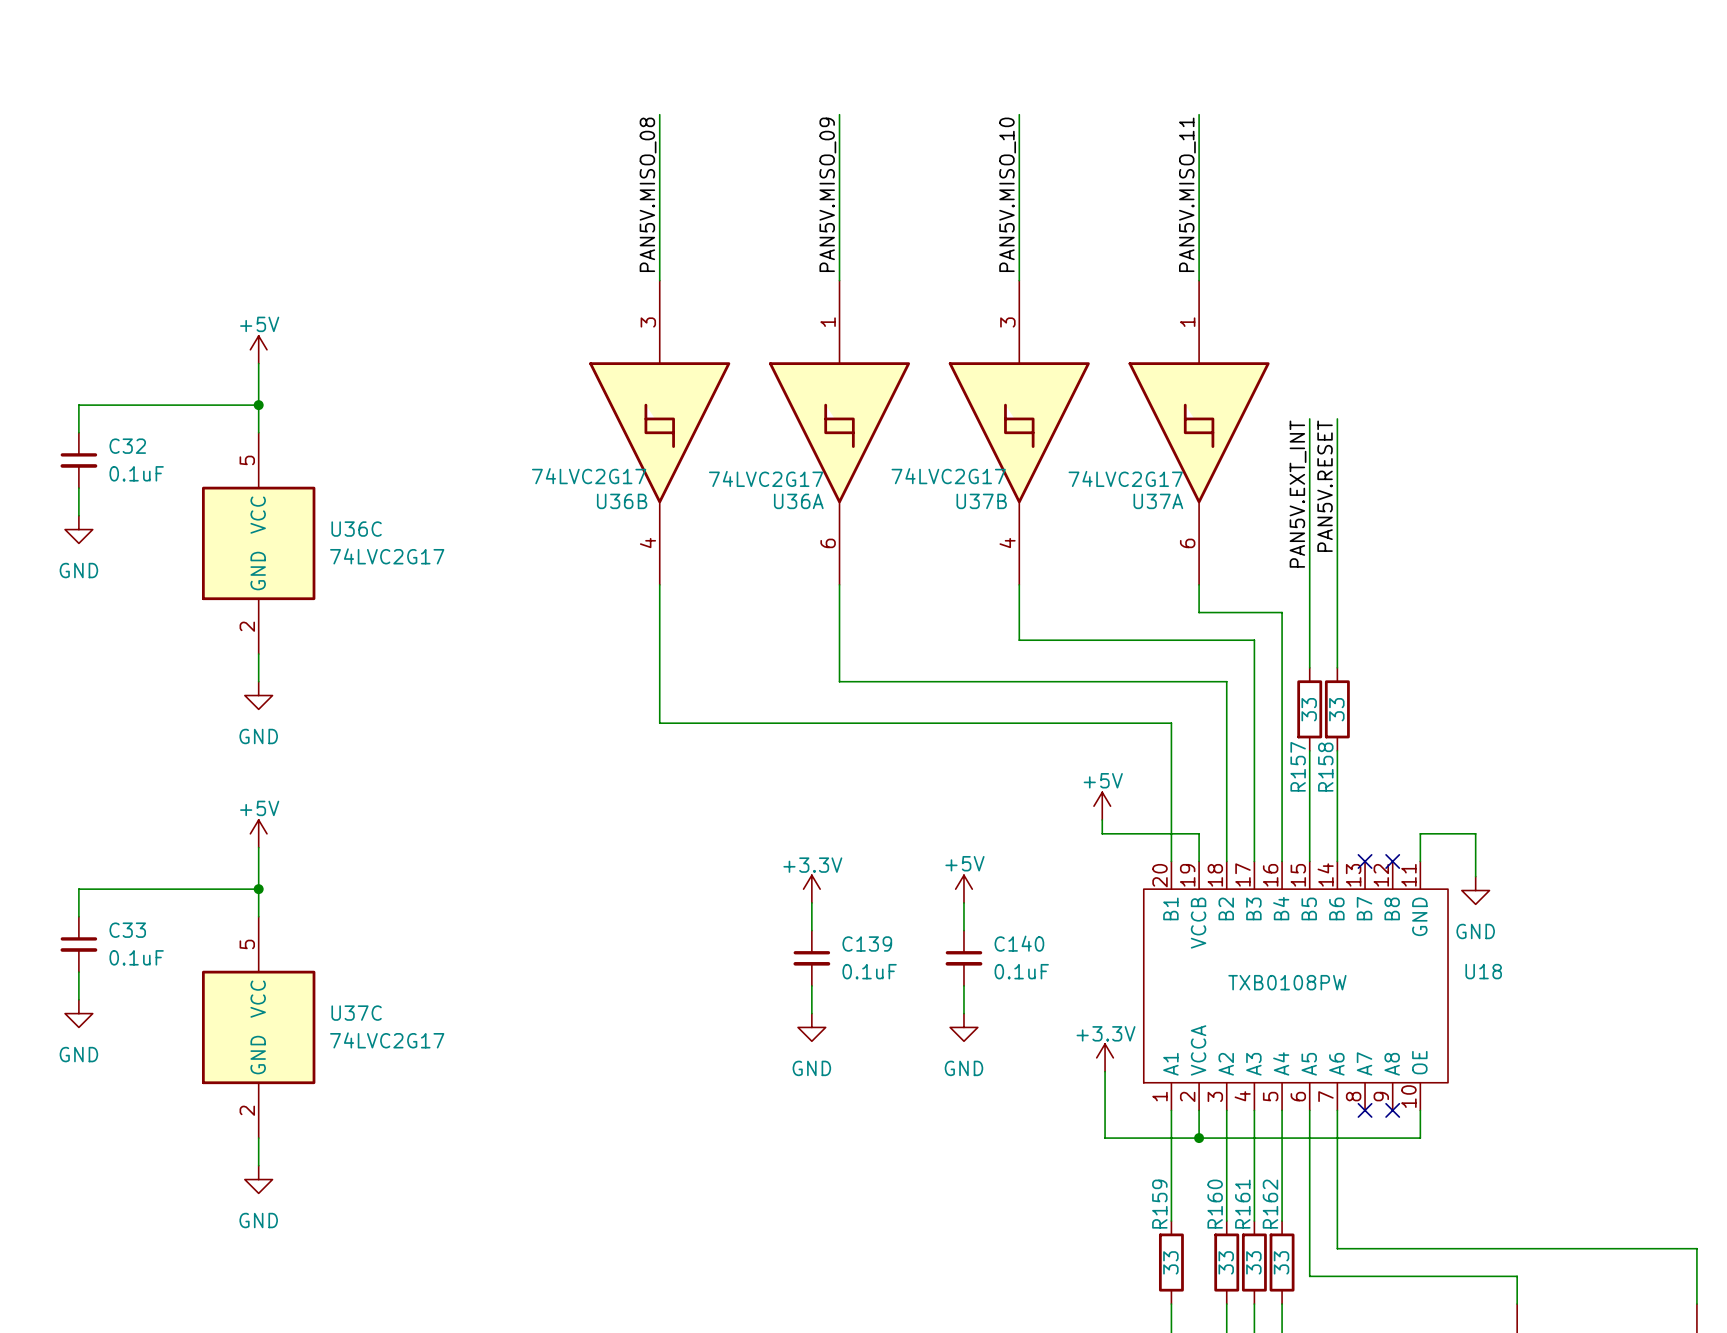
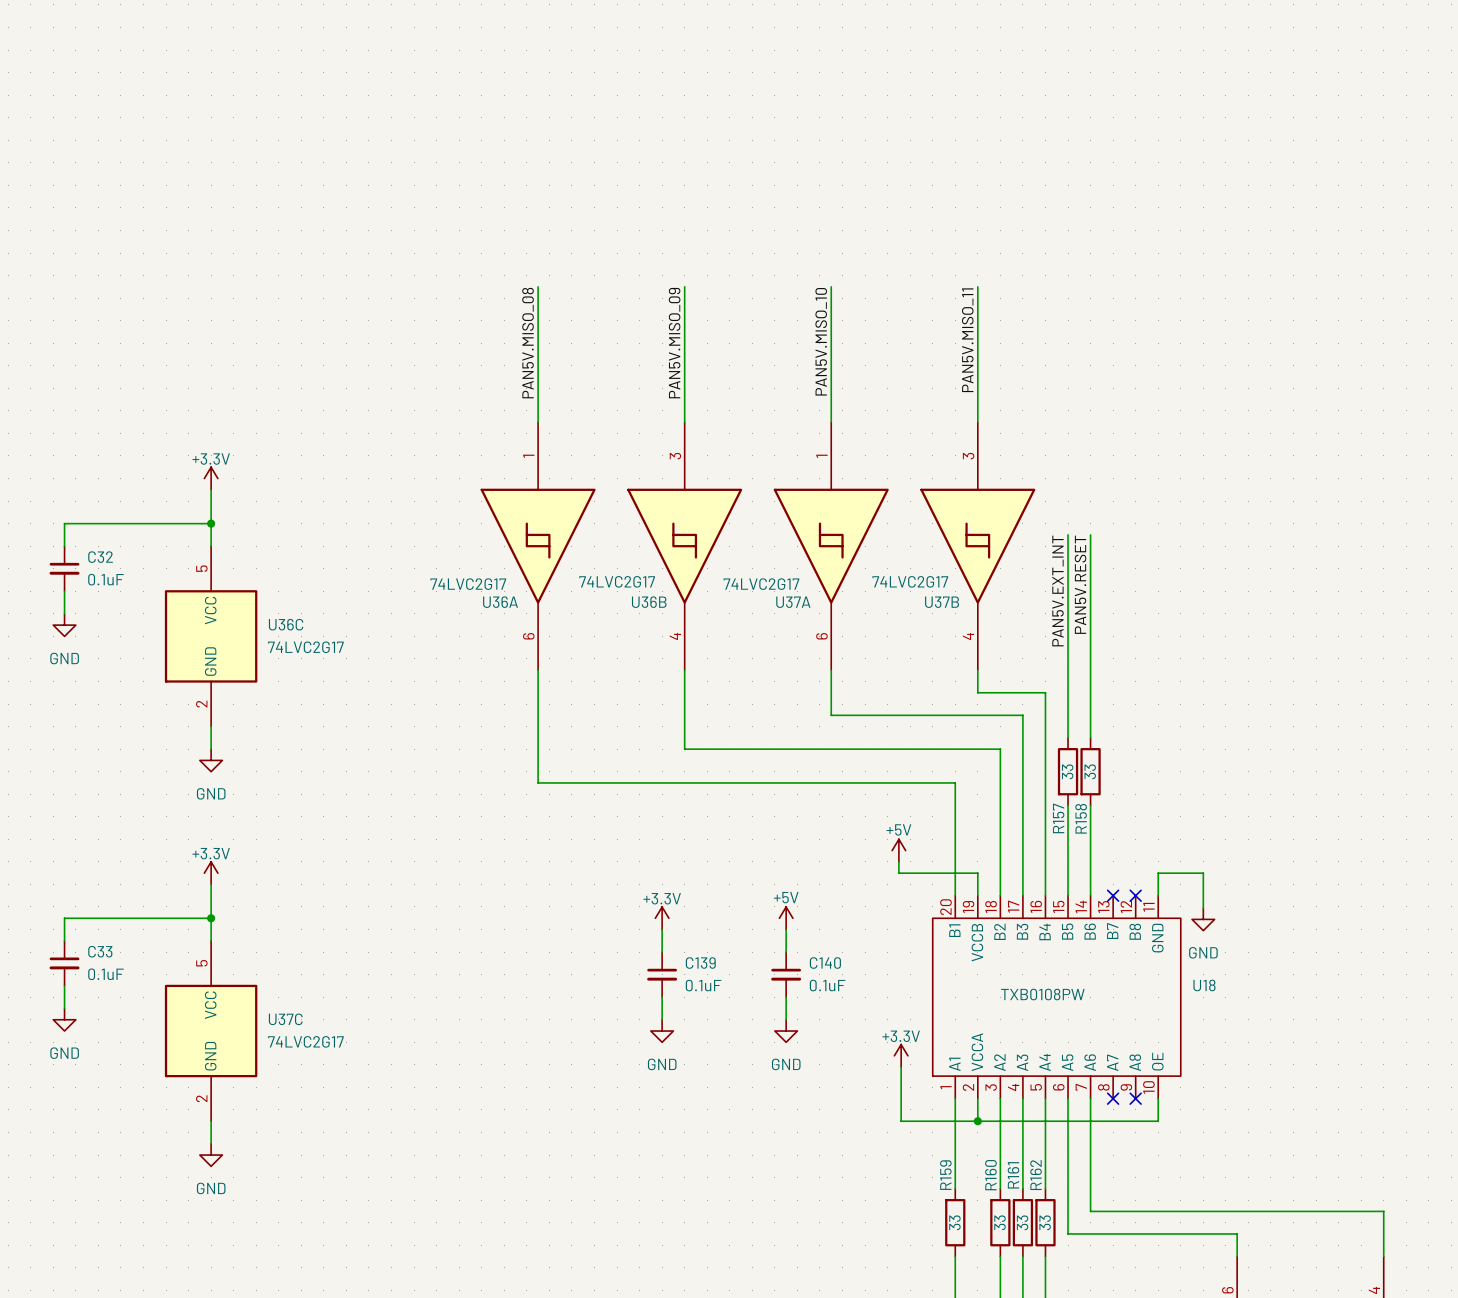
power symbol: +5V (258, 349) -> +3.3V (211, 478)
U36B position: (659, 432) -> (684, 546)
U36A position: (839, 432) -> (538, 546)
U37B position: (1019, 432) -> (977, 546)
U37A position: (1199, 432) -> (831, 546)
power symbol: +5V (258, 833) -> +3.3V (211, 873)

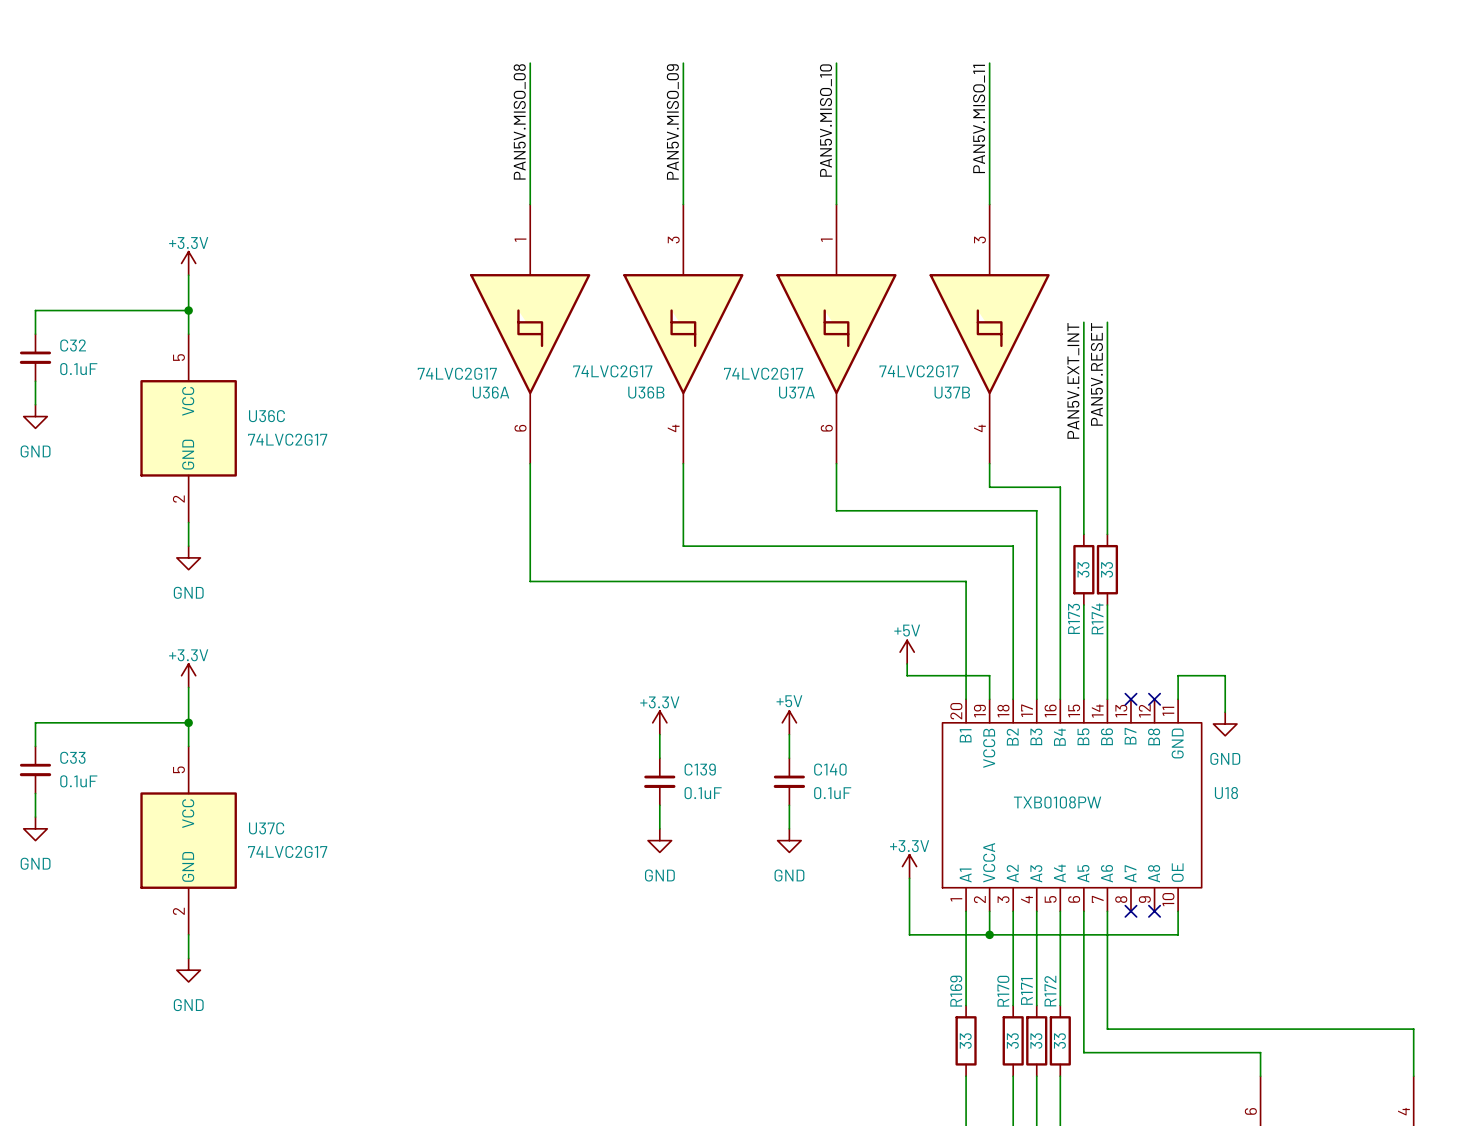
R157 name: R157 (1058, 818) -> R173 (1074, 618)
R158 name: R158 (1081, 818) -> R174 (1097, 618)
R159 name: R159 (945, 1175) -> R169 (956, 991)
R160 name: R160 (990, 1175) -> R170 (1003, 991)
R161 name: R161 (1013, 1175) -> R171 (1026, 991)
R162 name: R162 (1036, 1175) -> R172 (1050, 991)

